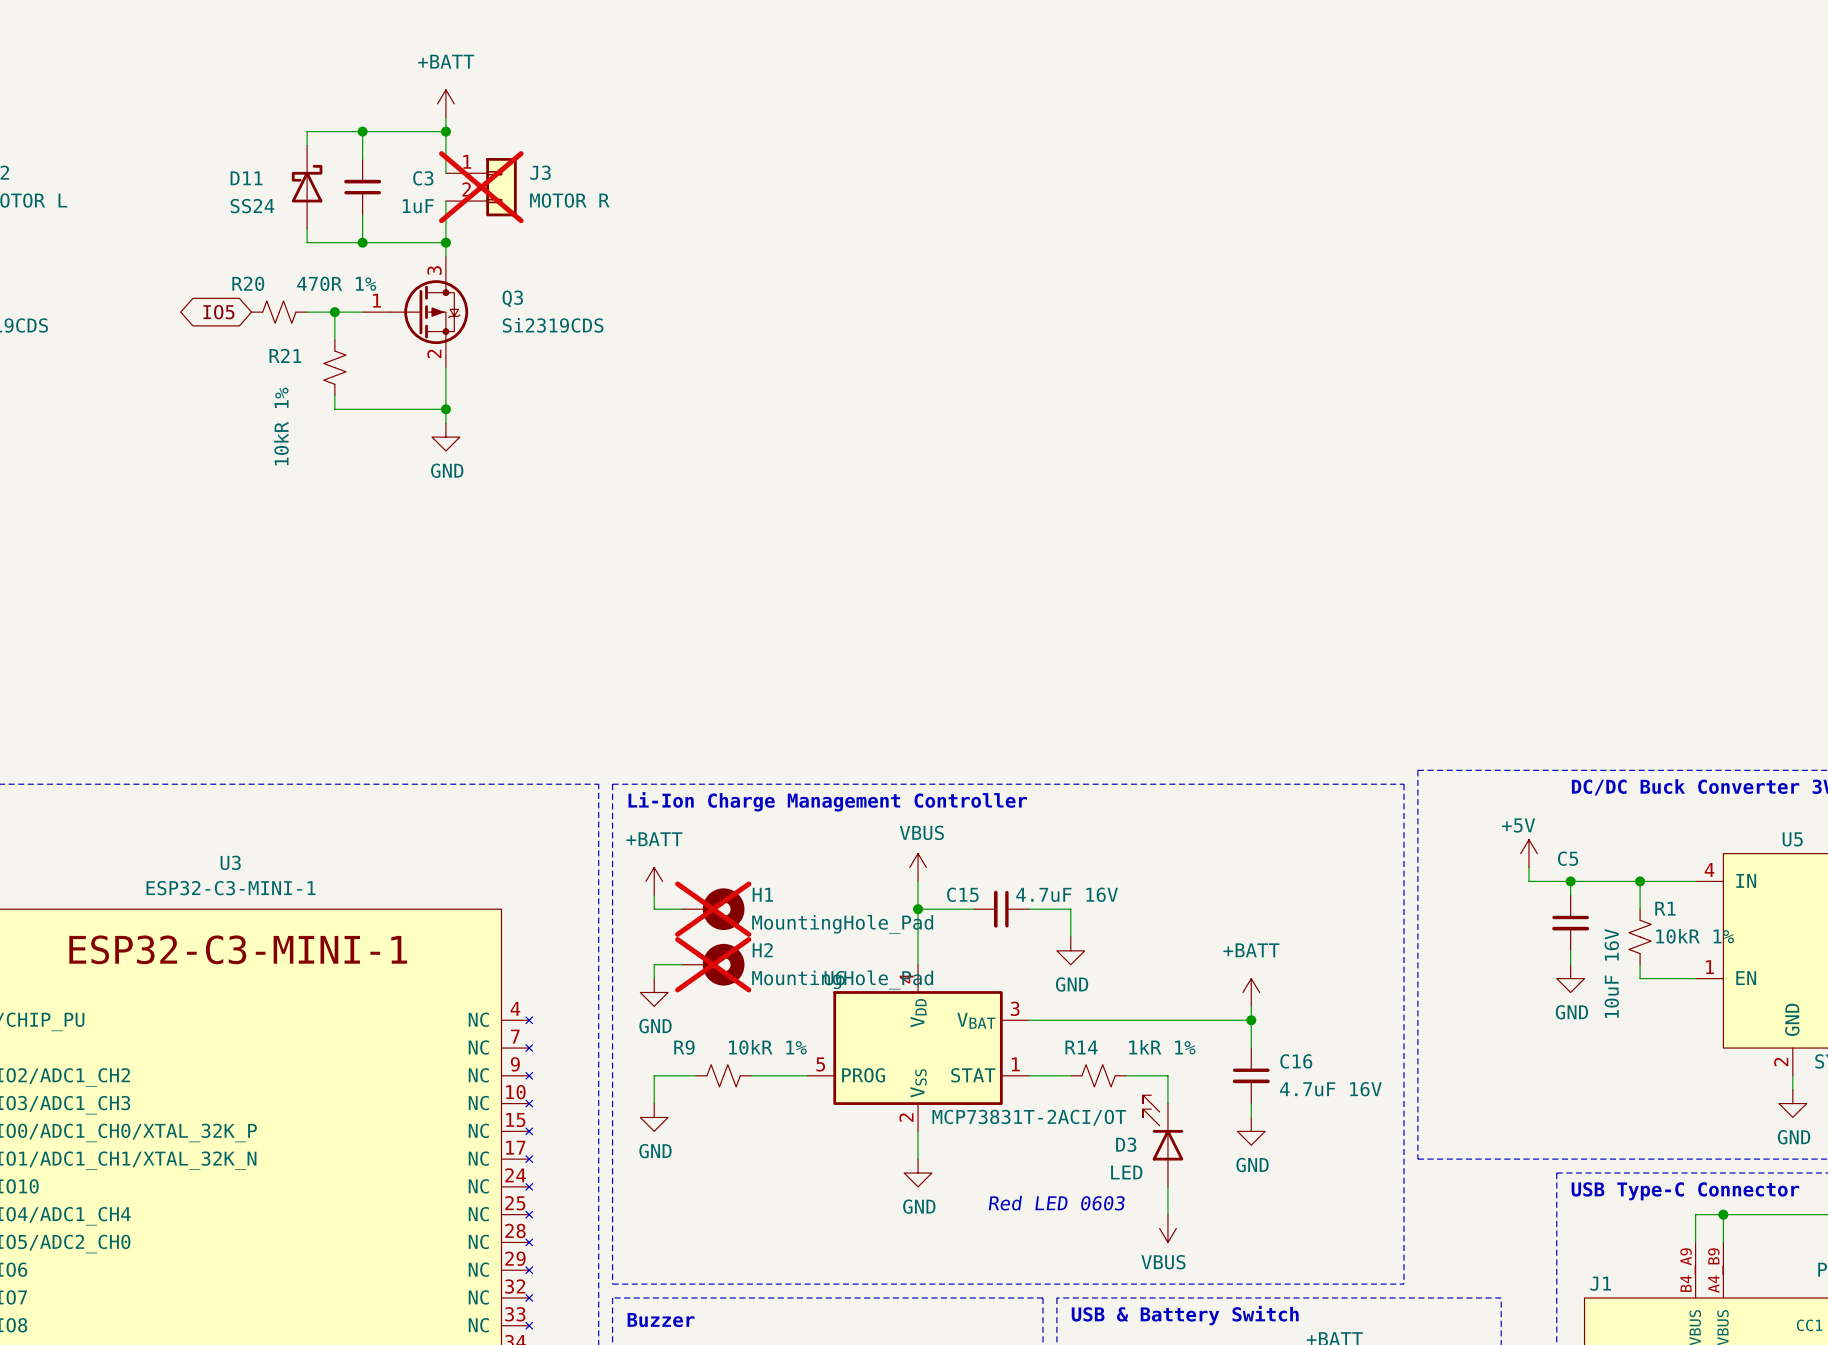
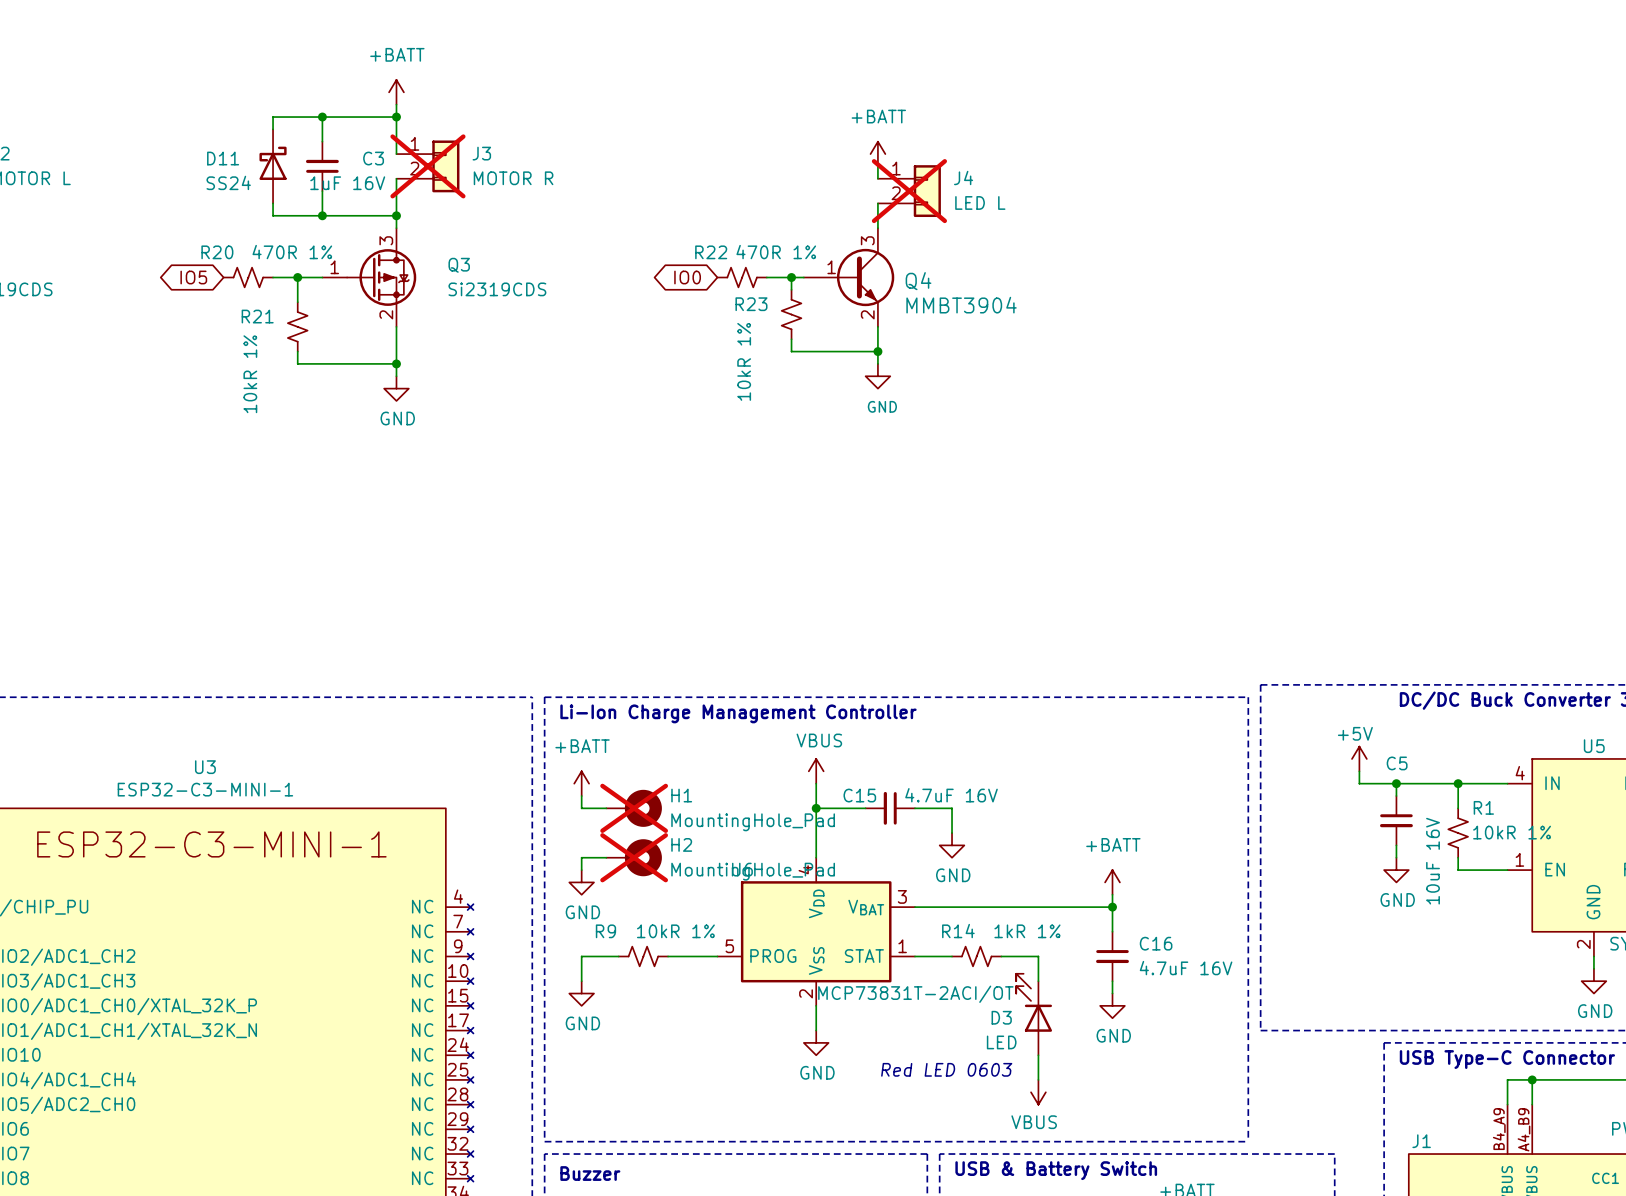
power symbol: none -> +BATT (877, 154)
wire: none -> (877, 166) (877, 178)
C3 value: 1uF (418, 206) -> 1uF 16V (347, 183)
J4: none -> LED L (909, 191)
wire: none -> (877, 203) (877, 228)
global label: none -> IO0 (687, 277)
R22: none -> 470R 1% (742, 277)
wire: none -> (766, 277) (803, 277)
wire: none -> (791, 277) (791, 289)
junction: none -> (791, 277)
Q4: none -> MMBT3904 (849, 277)
R23: none -> 10kR 1% (791, 314)
wire: none -> (877, 326) (877, 363)
wire: none -> (791, 339) (791, 351) (877, 351)
junction: none -> (877, 351)
power symbol: none -> GND (877, 376)

